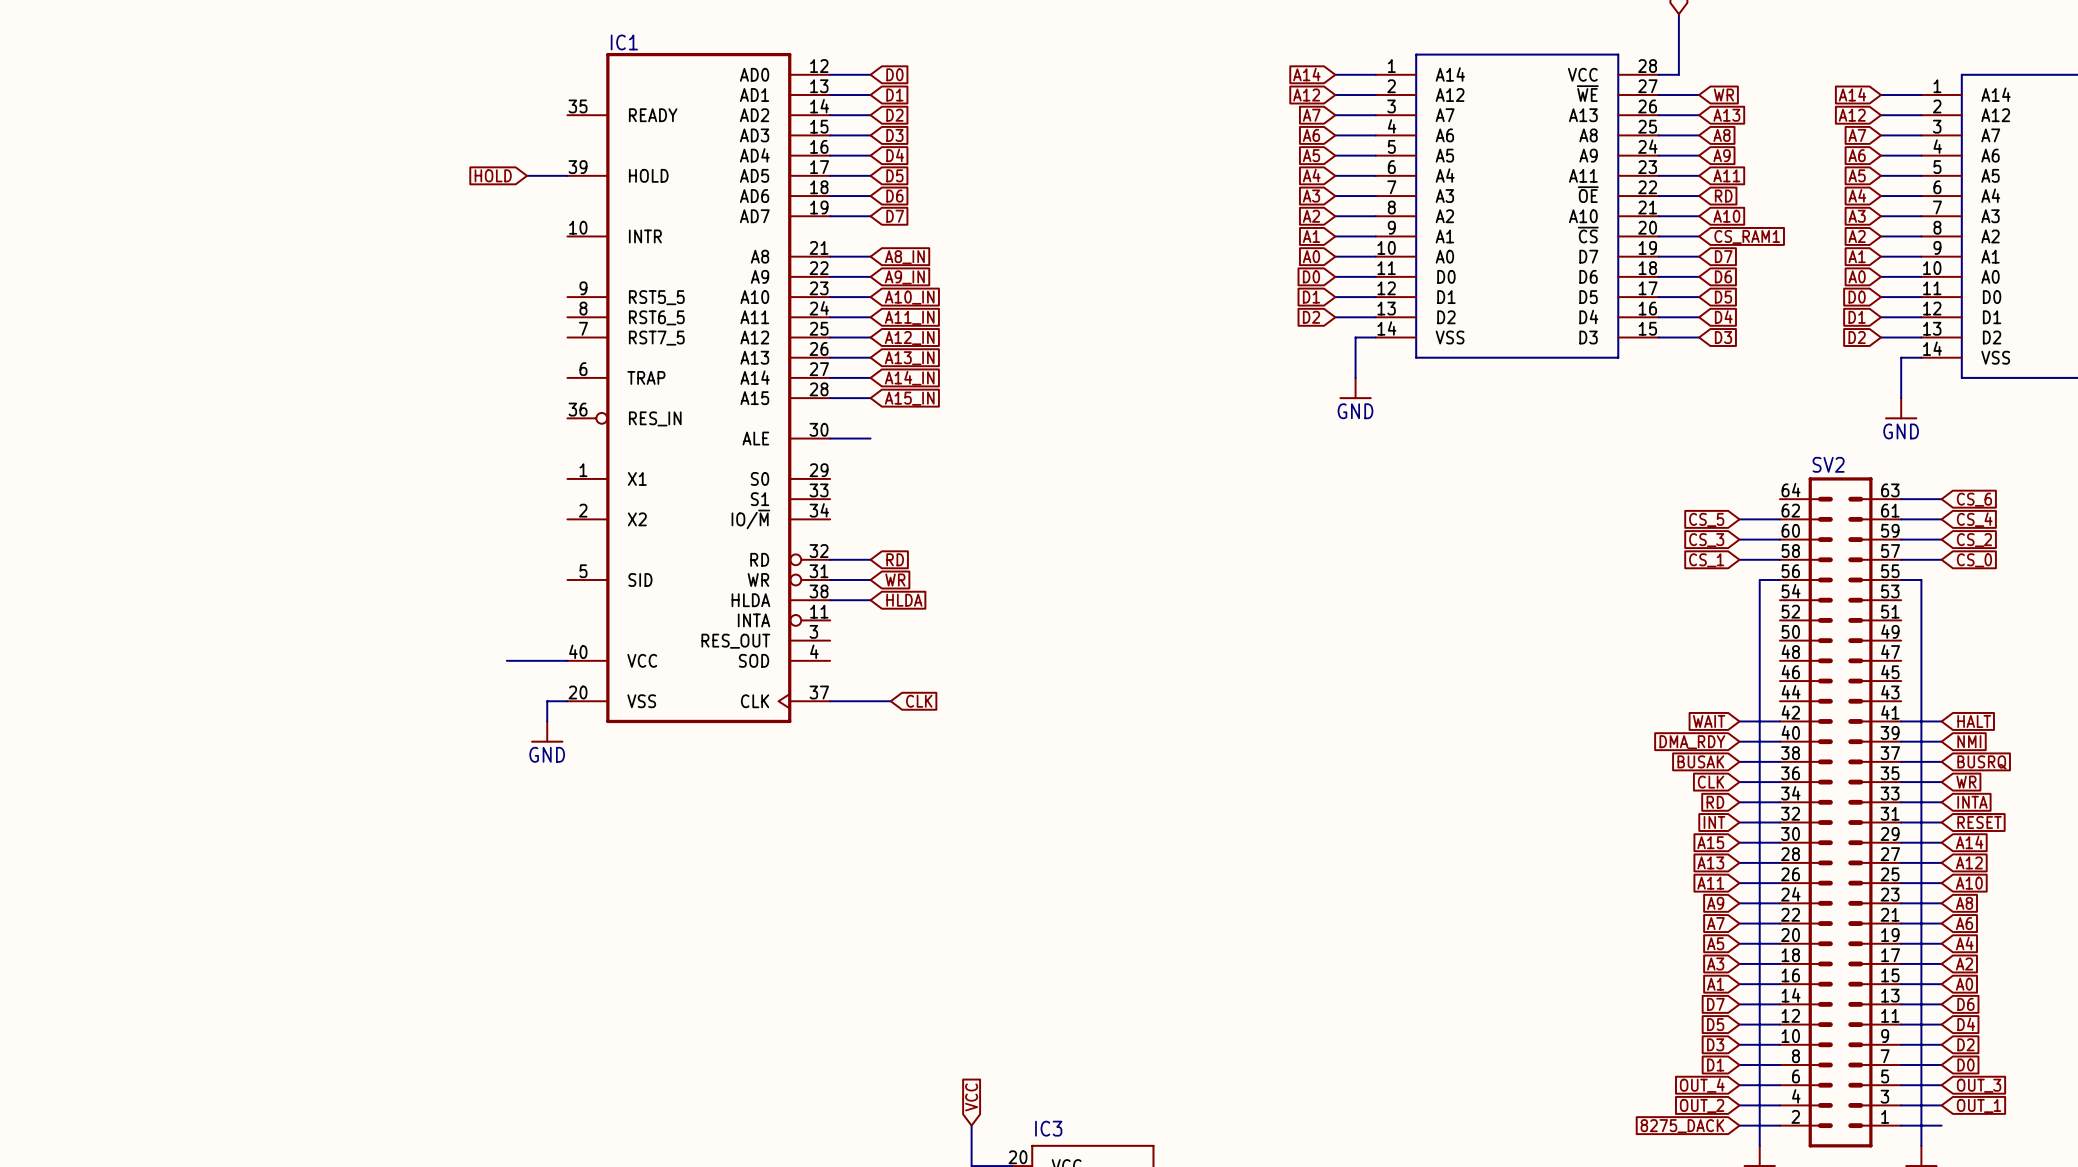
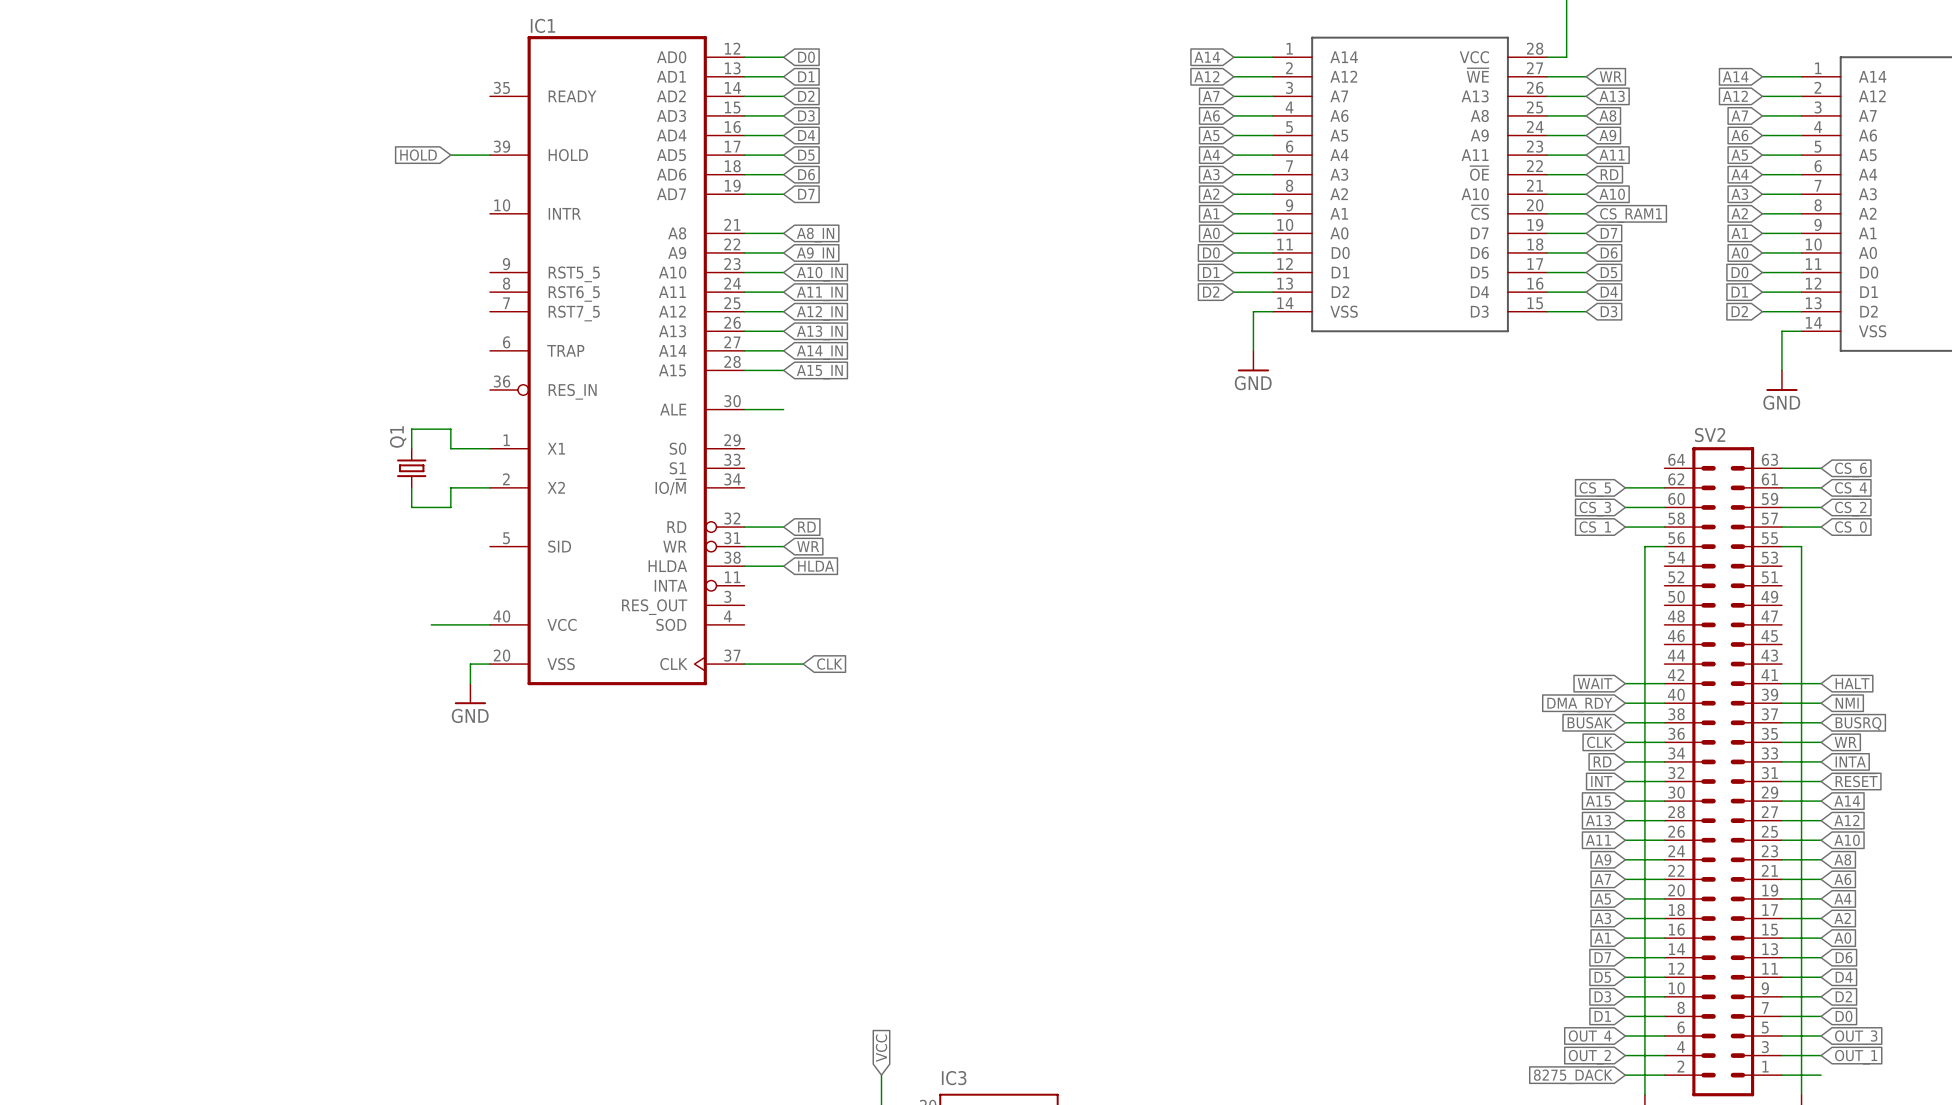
wire: none -> (411, 448) (411, 429) (450, 429) (450, 448) (489, 448)
Q1: none -> (411, 468)
wire: none -> (411, 487) (411, 507) (450, 507) (450, 487) (489, 487)

